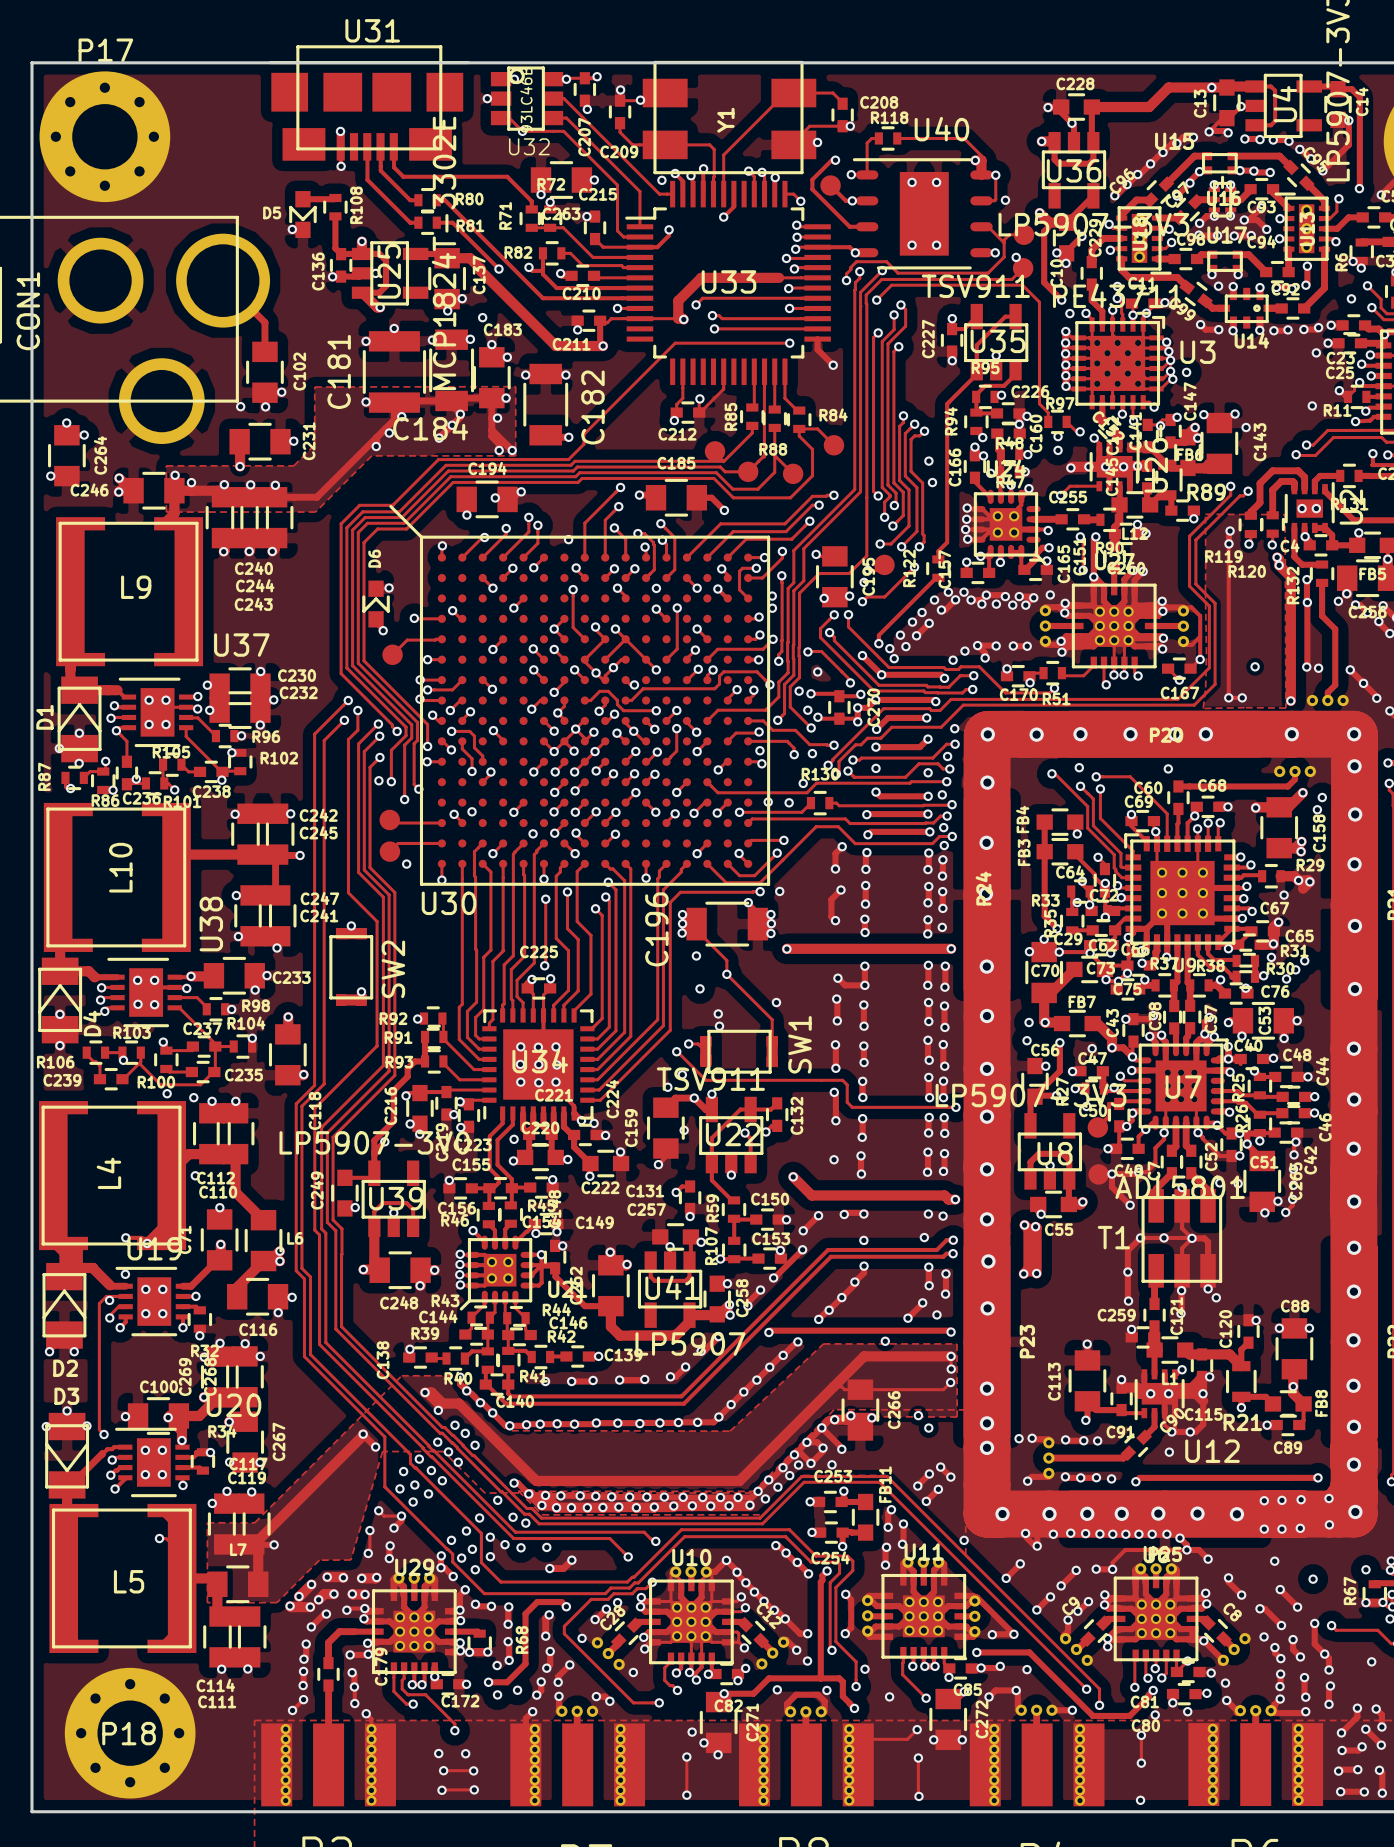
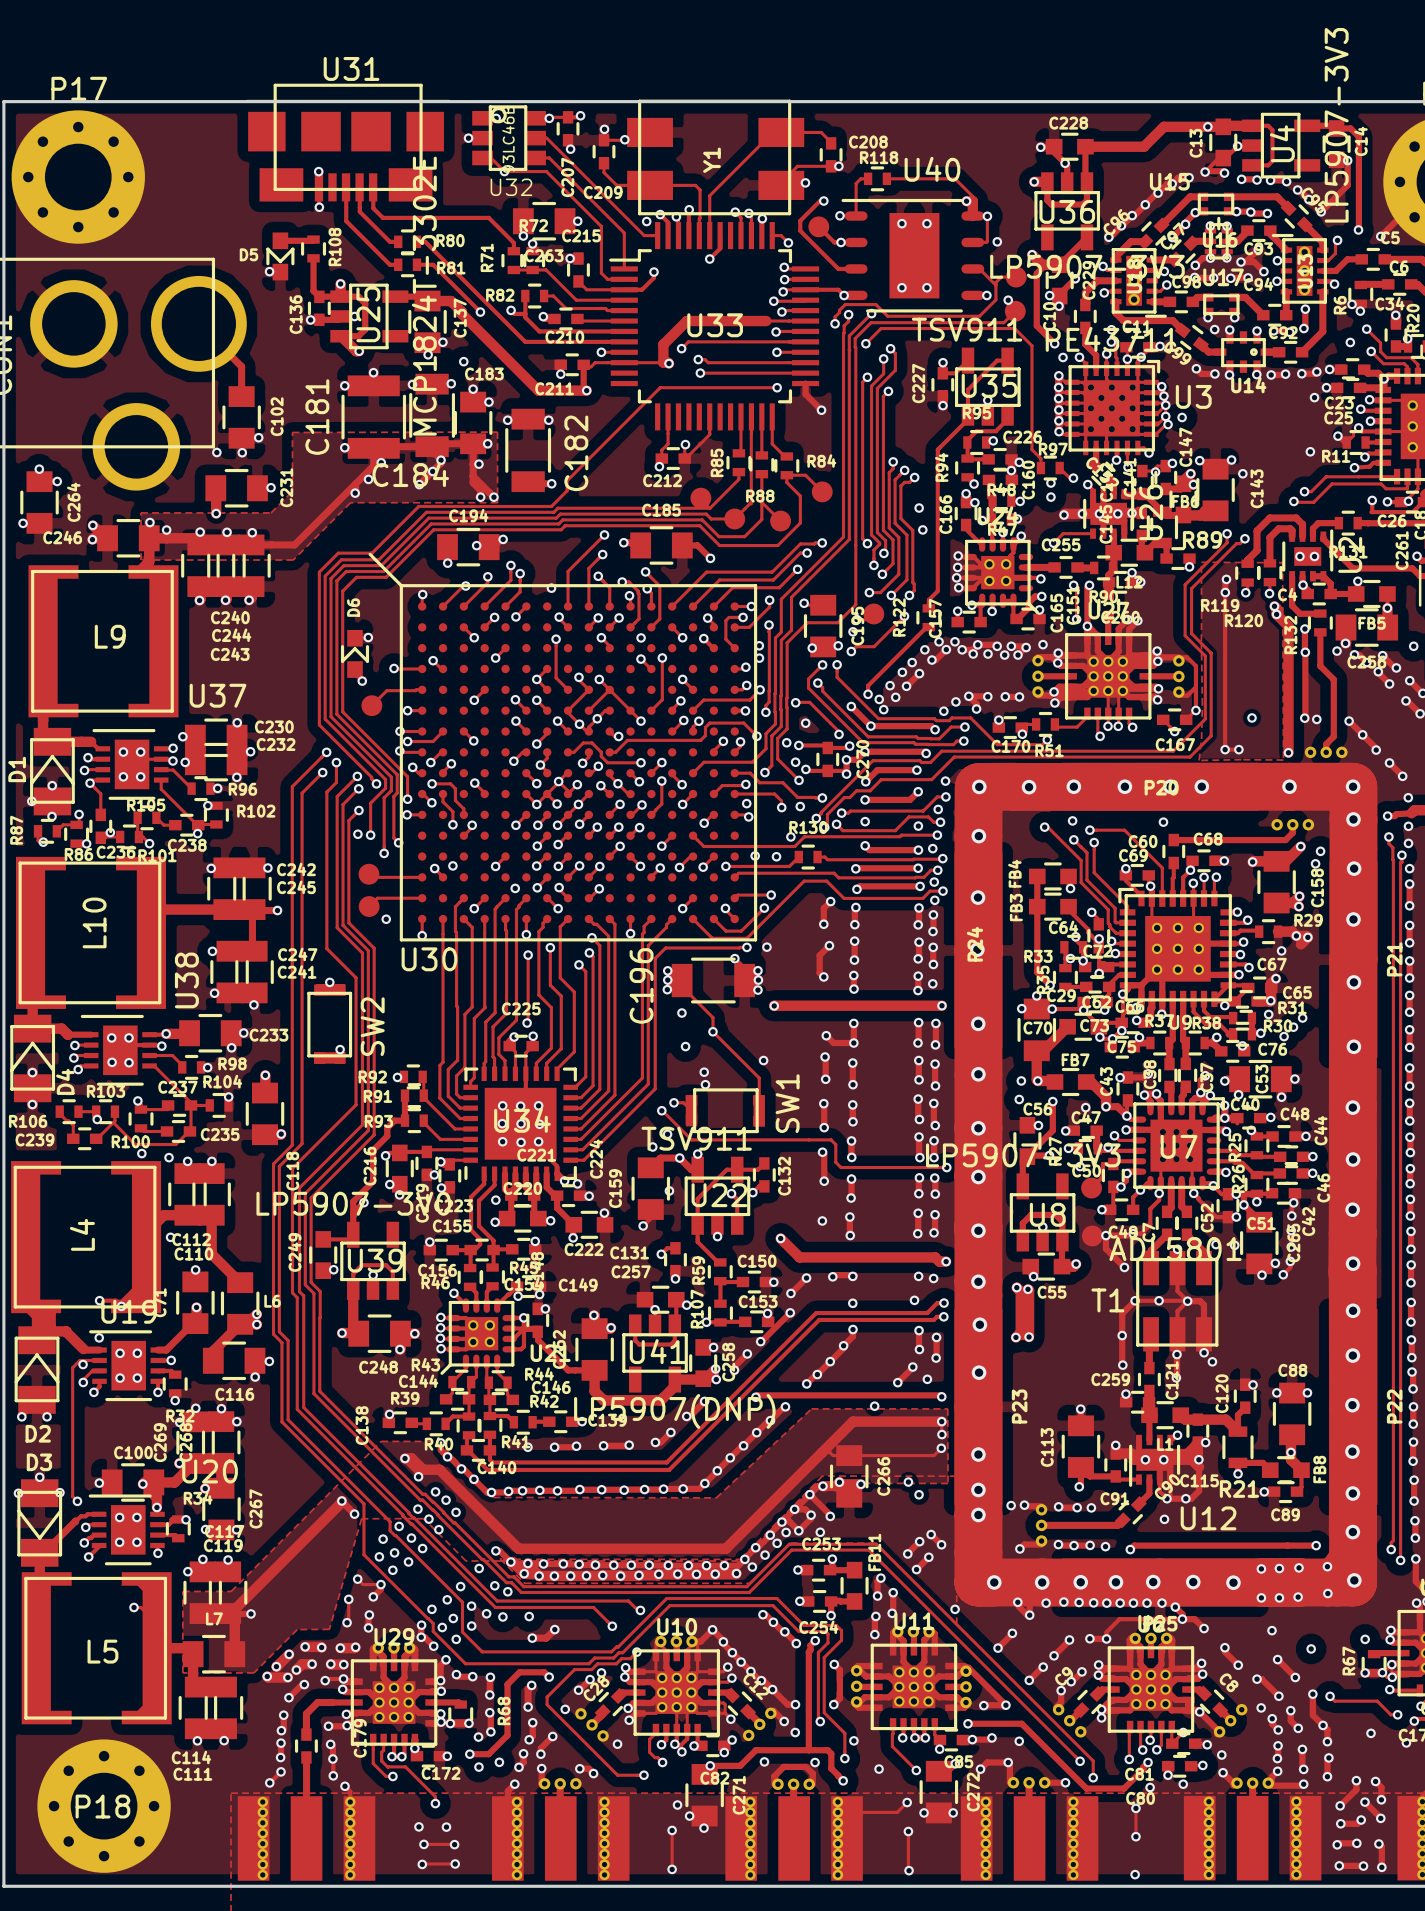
U41 value: LP5907 (690, 1343) -> LP5907(DNP) (674, 1411)

